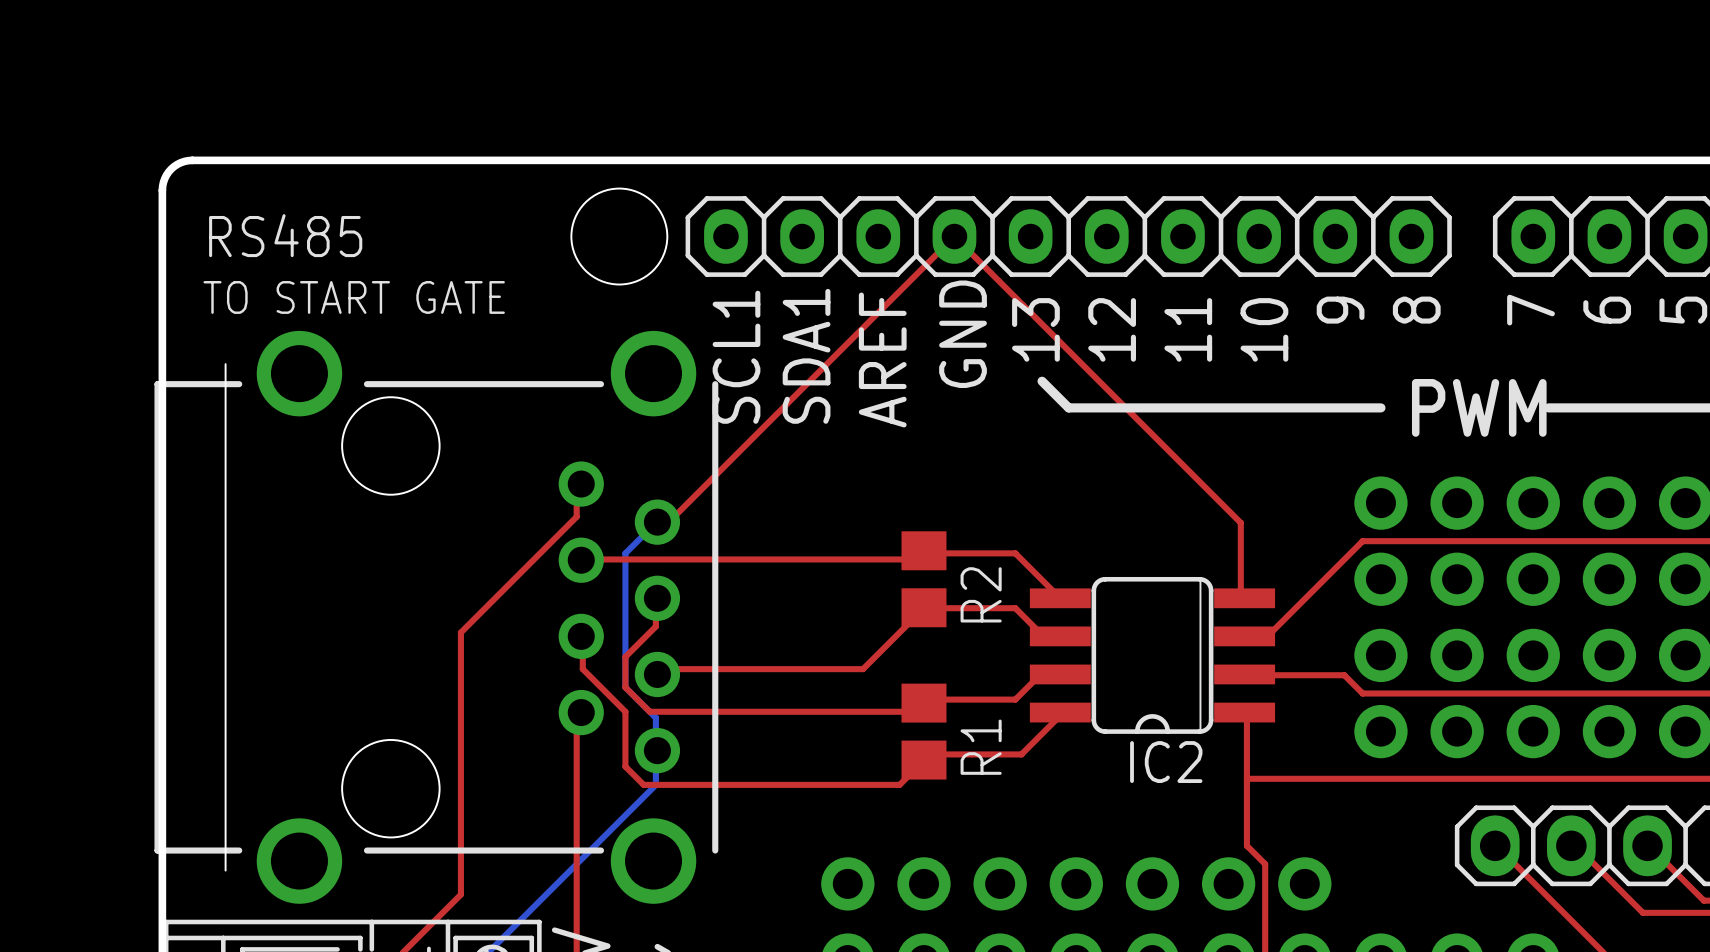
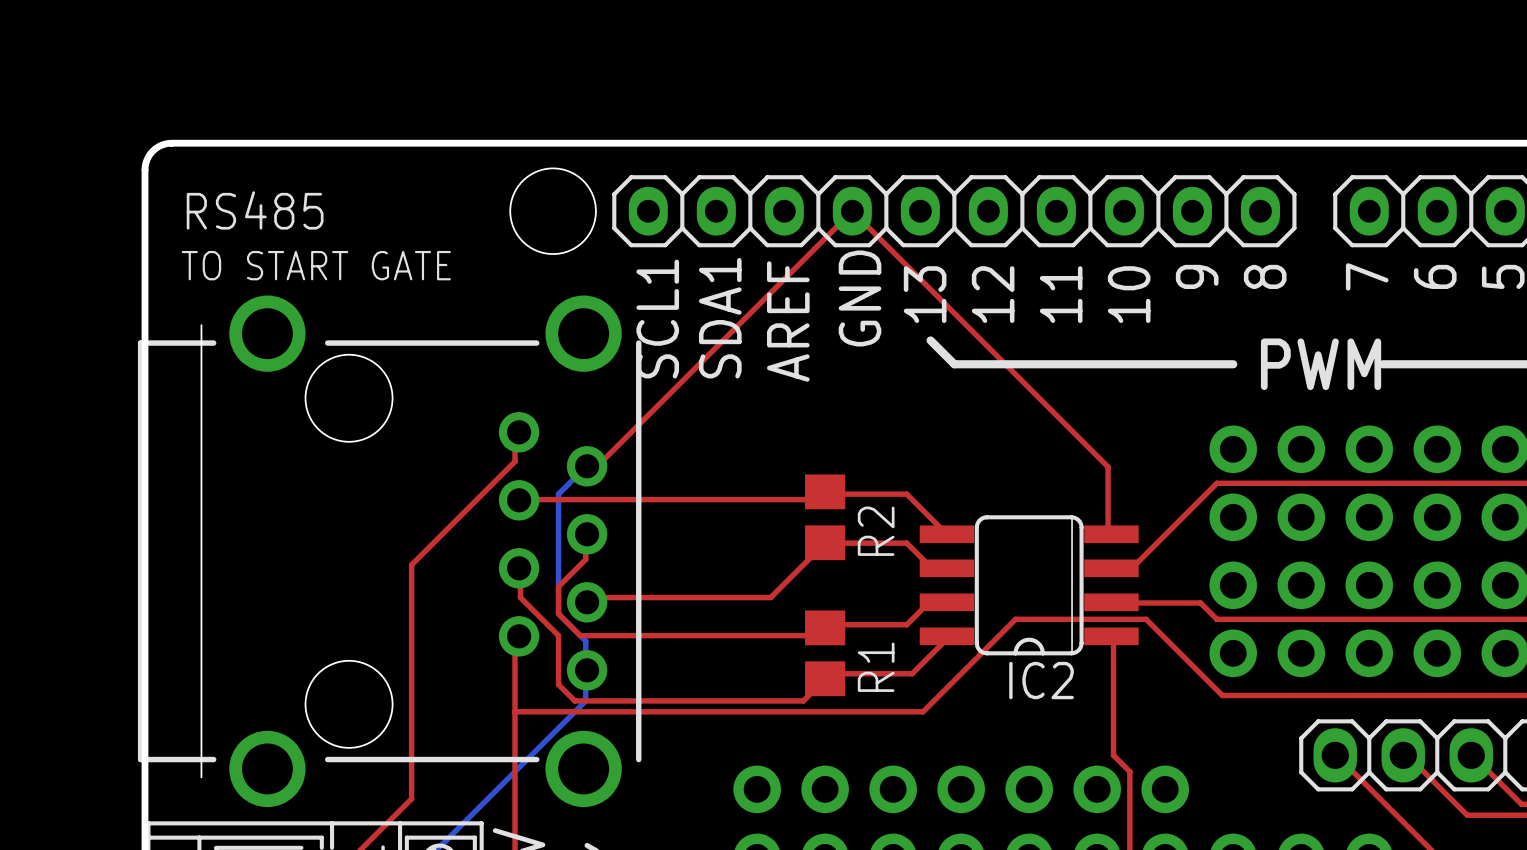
top track: (1246, 778) (1368, 778) -> (515, 711) (923, 711) (1015, 619) (1146, 619) (1222, 695)

